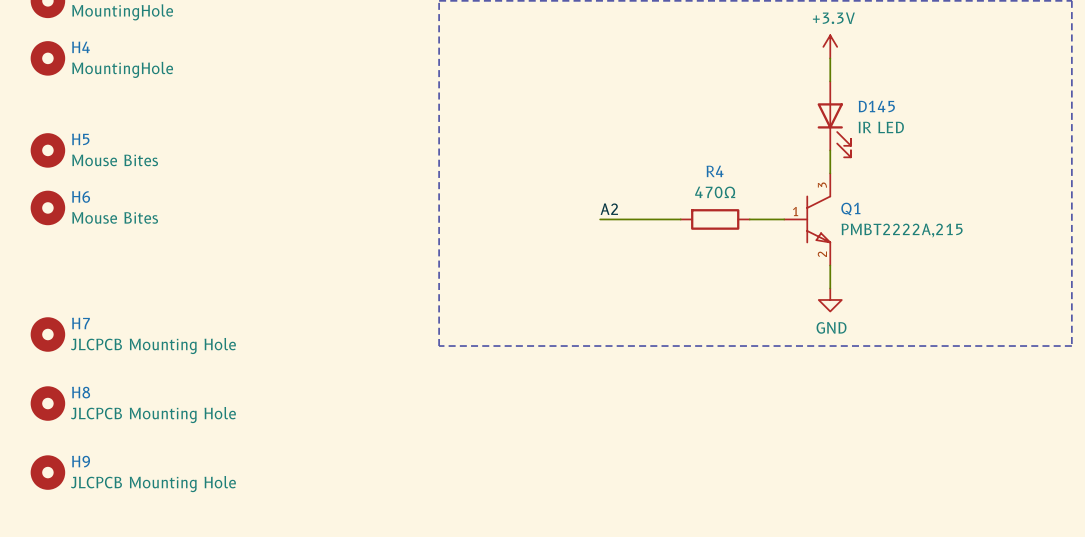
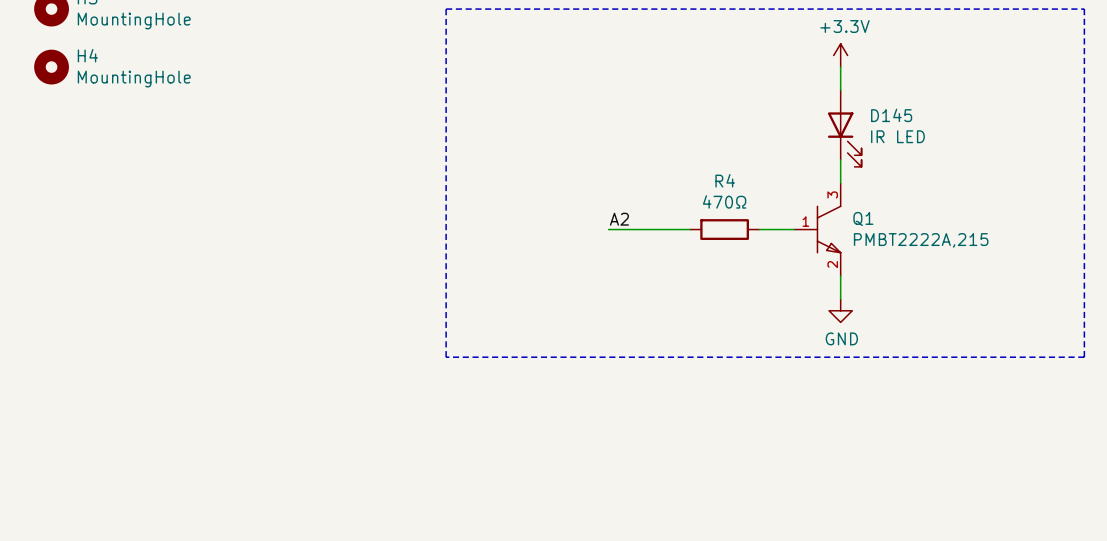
H5: Mouse Bites (47, 150) -> none
H6: Mouse Bites (47, 207) -> none
H7: JLCPCB Mounting Hole (47, 334) -> none
H8: JLCPCB Mounting Hole (47, 403) -> none
H9: JLCPCB Mounting Hole (47, 472) -> none

